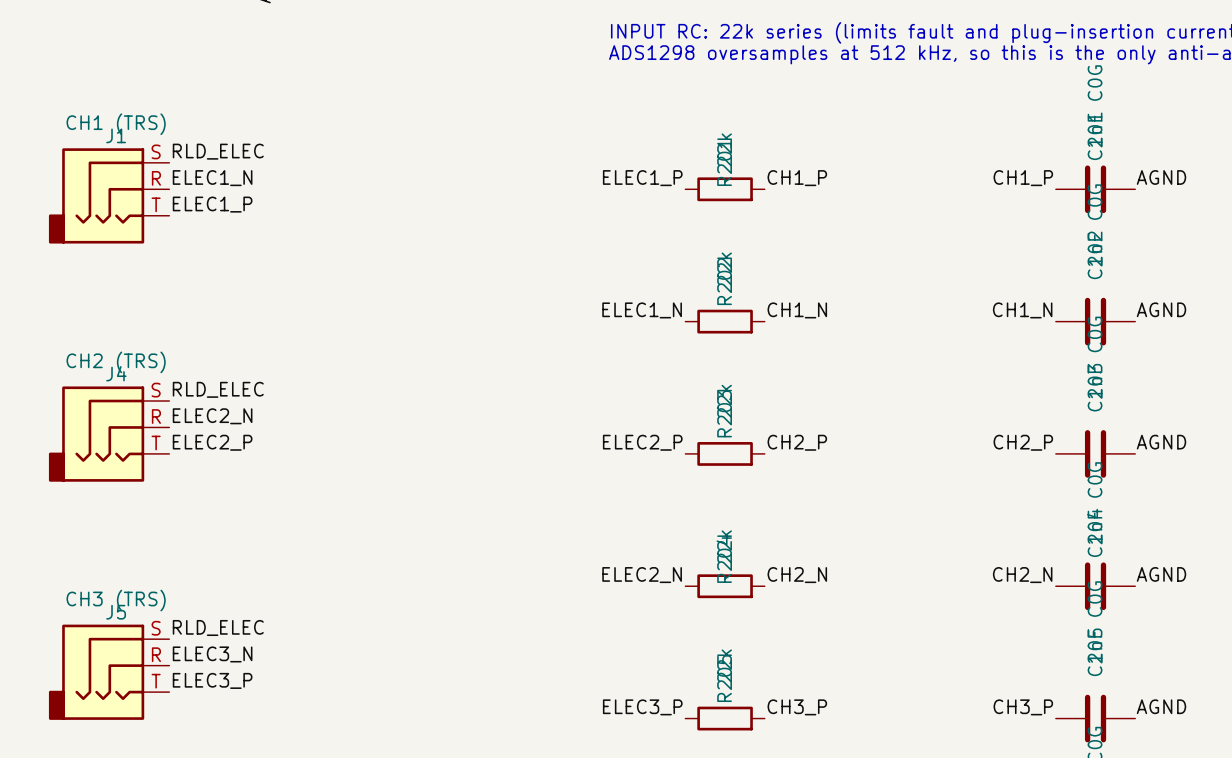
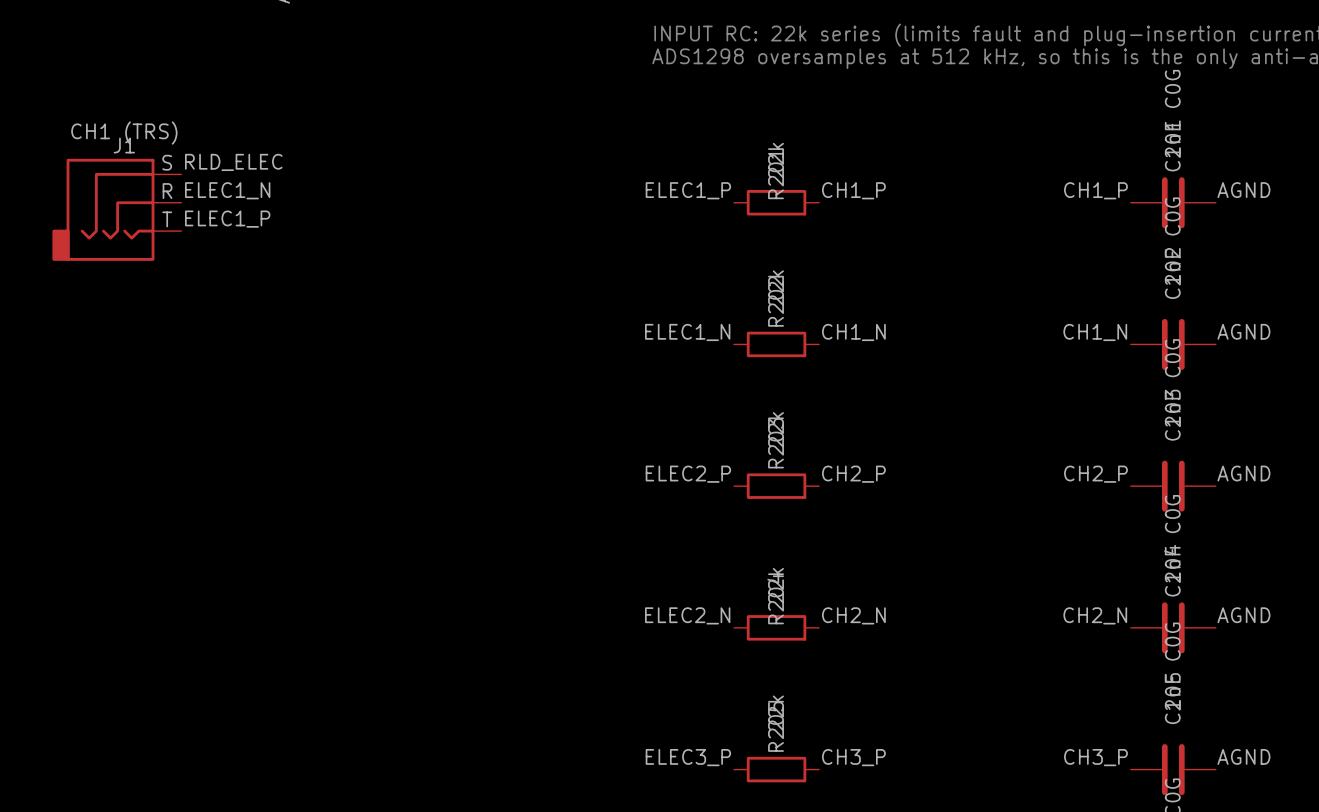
label: RLD_ELEC (218, 389) -> none
label: ELEC2_N (212, 416) -> none
J4: CH2 (TRS) (109, 434) -> none
label: ELEC2_P (212, 442) -> none
label: RLD_ELEC (218, 627) -> none
label: ELEC3_N (212, 654) -> none
J5: CH3 (TRS) (109, 672) -> none
label: ELEC3_P (212, 680) -> none

